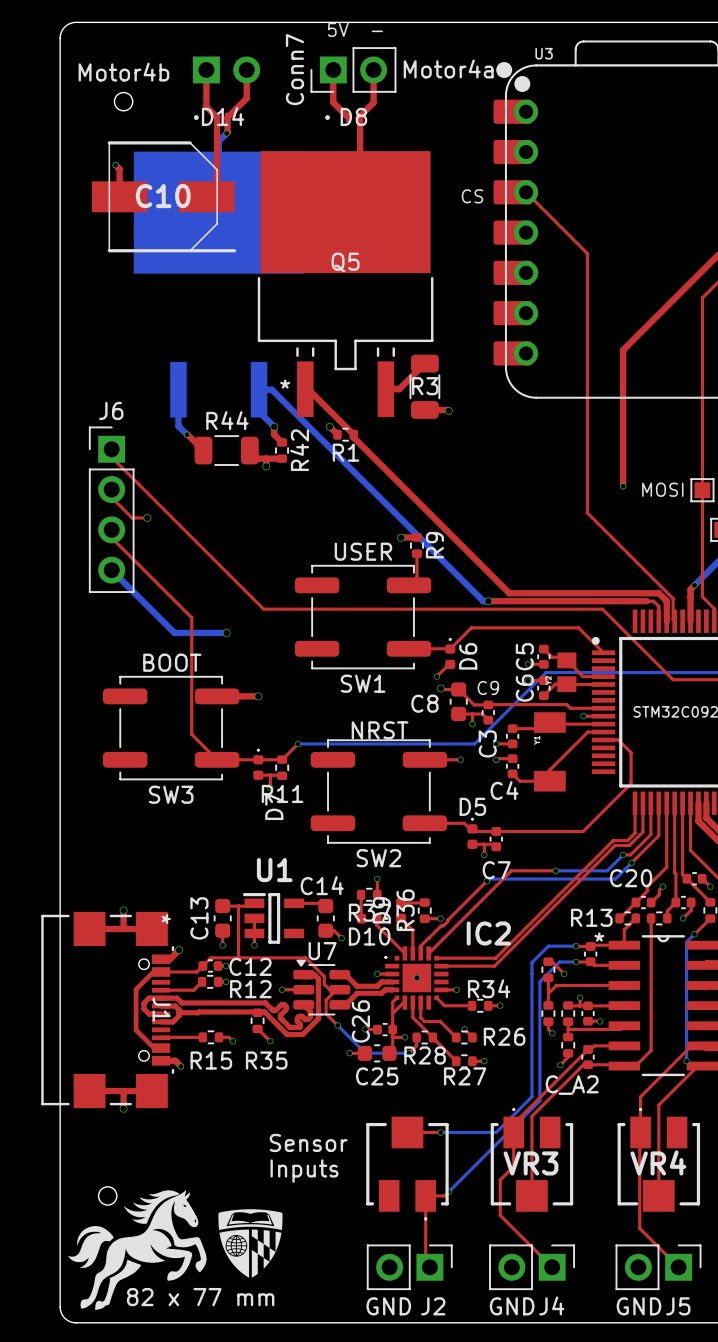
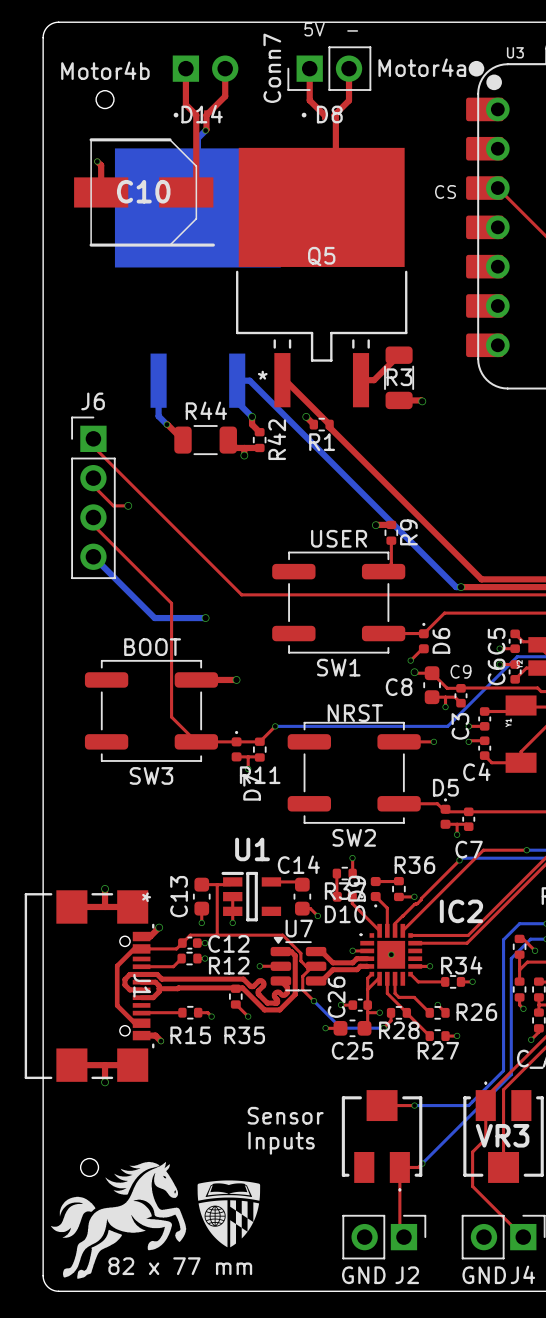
R36 name rotation: 0° (405, 910) -> 90° clockwise (414, 865)

